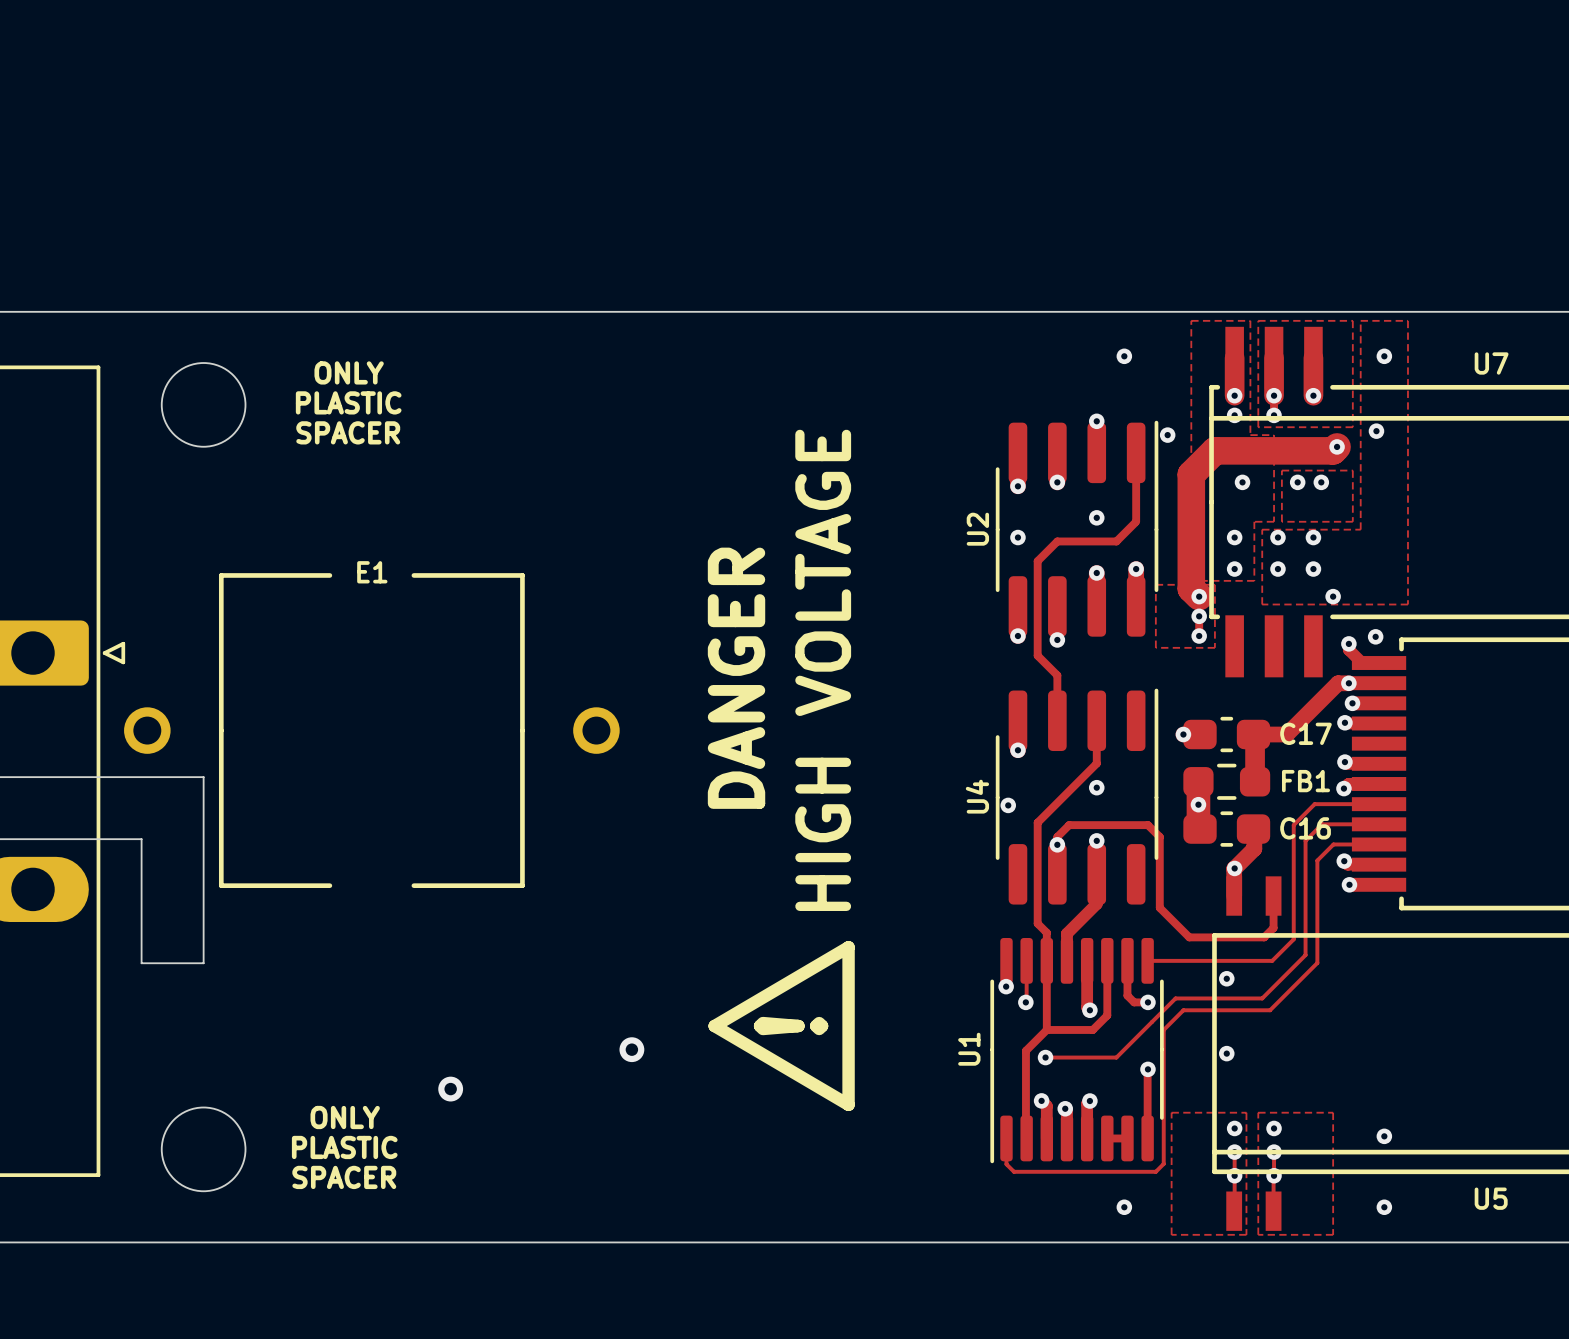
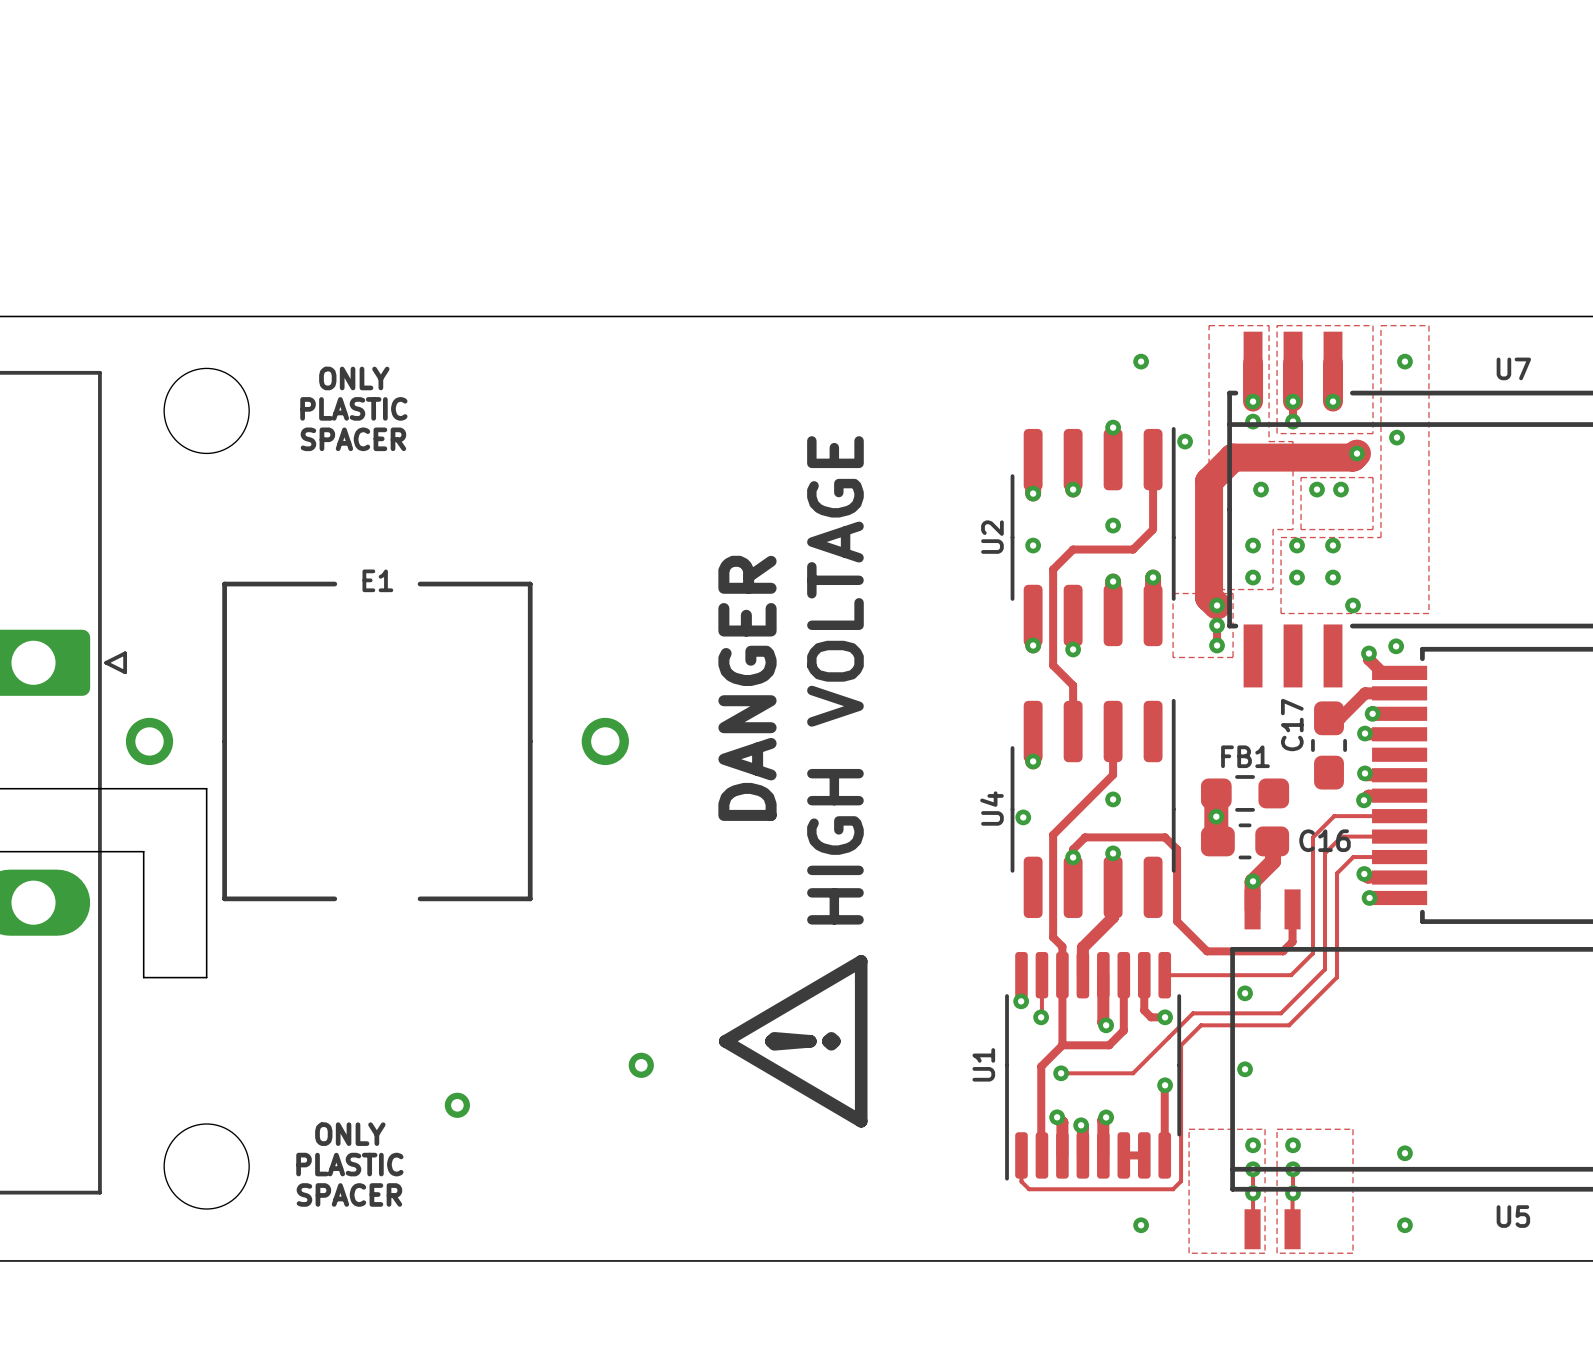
track: (1348, 683) (1338, 683) (1286, 734) (1253, 734) (1255, 781) -> (1369, 693) (1365, 693) (1340, 718) (1329, 718)
via: (1348, 683) -> none
C17 name position: C17 (1306, 733) -> C17 (1292, 725)
via: (1183, 734) -> none
C17 rotation: 0° (1226, 734) -> 90° clockwise (1329, 745)
C17 position: (1226, 734) -> (1329, 745)
FB1 name position: FB1 (1306, 781) -> FB1 (1245, 756)

